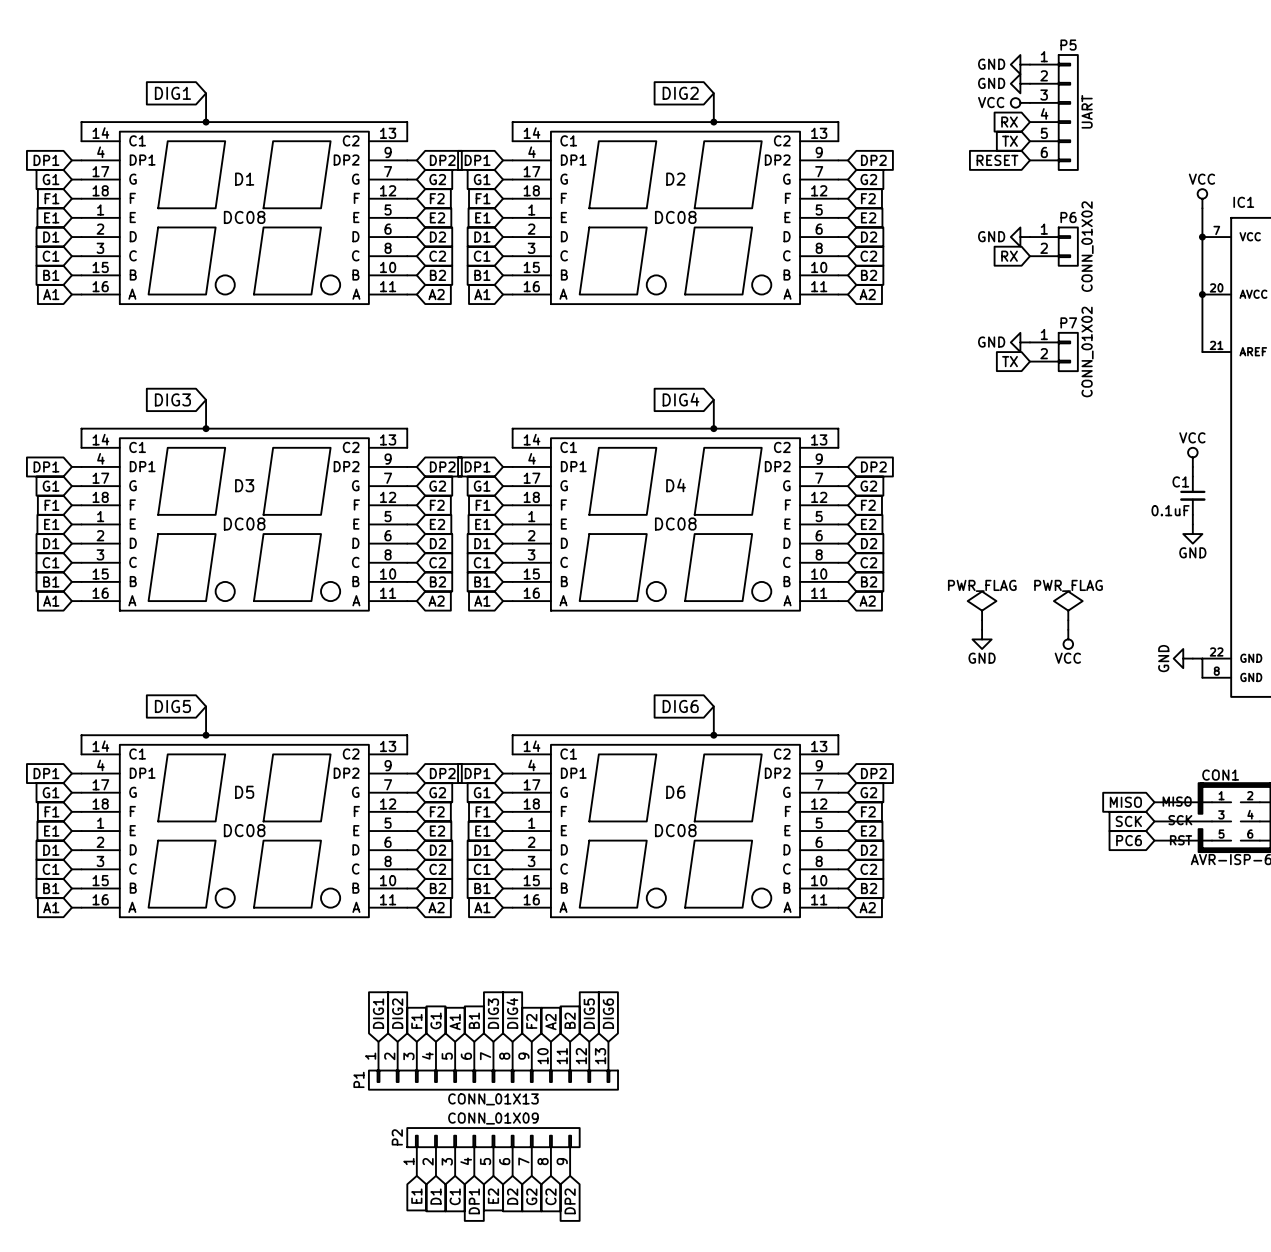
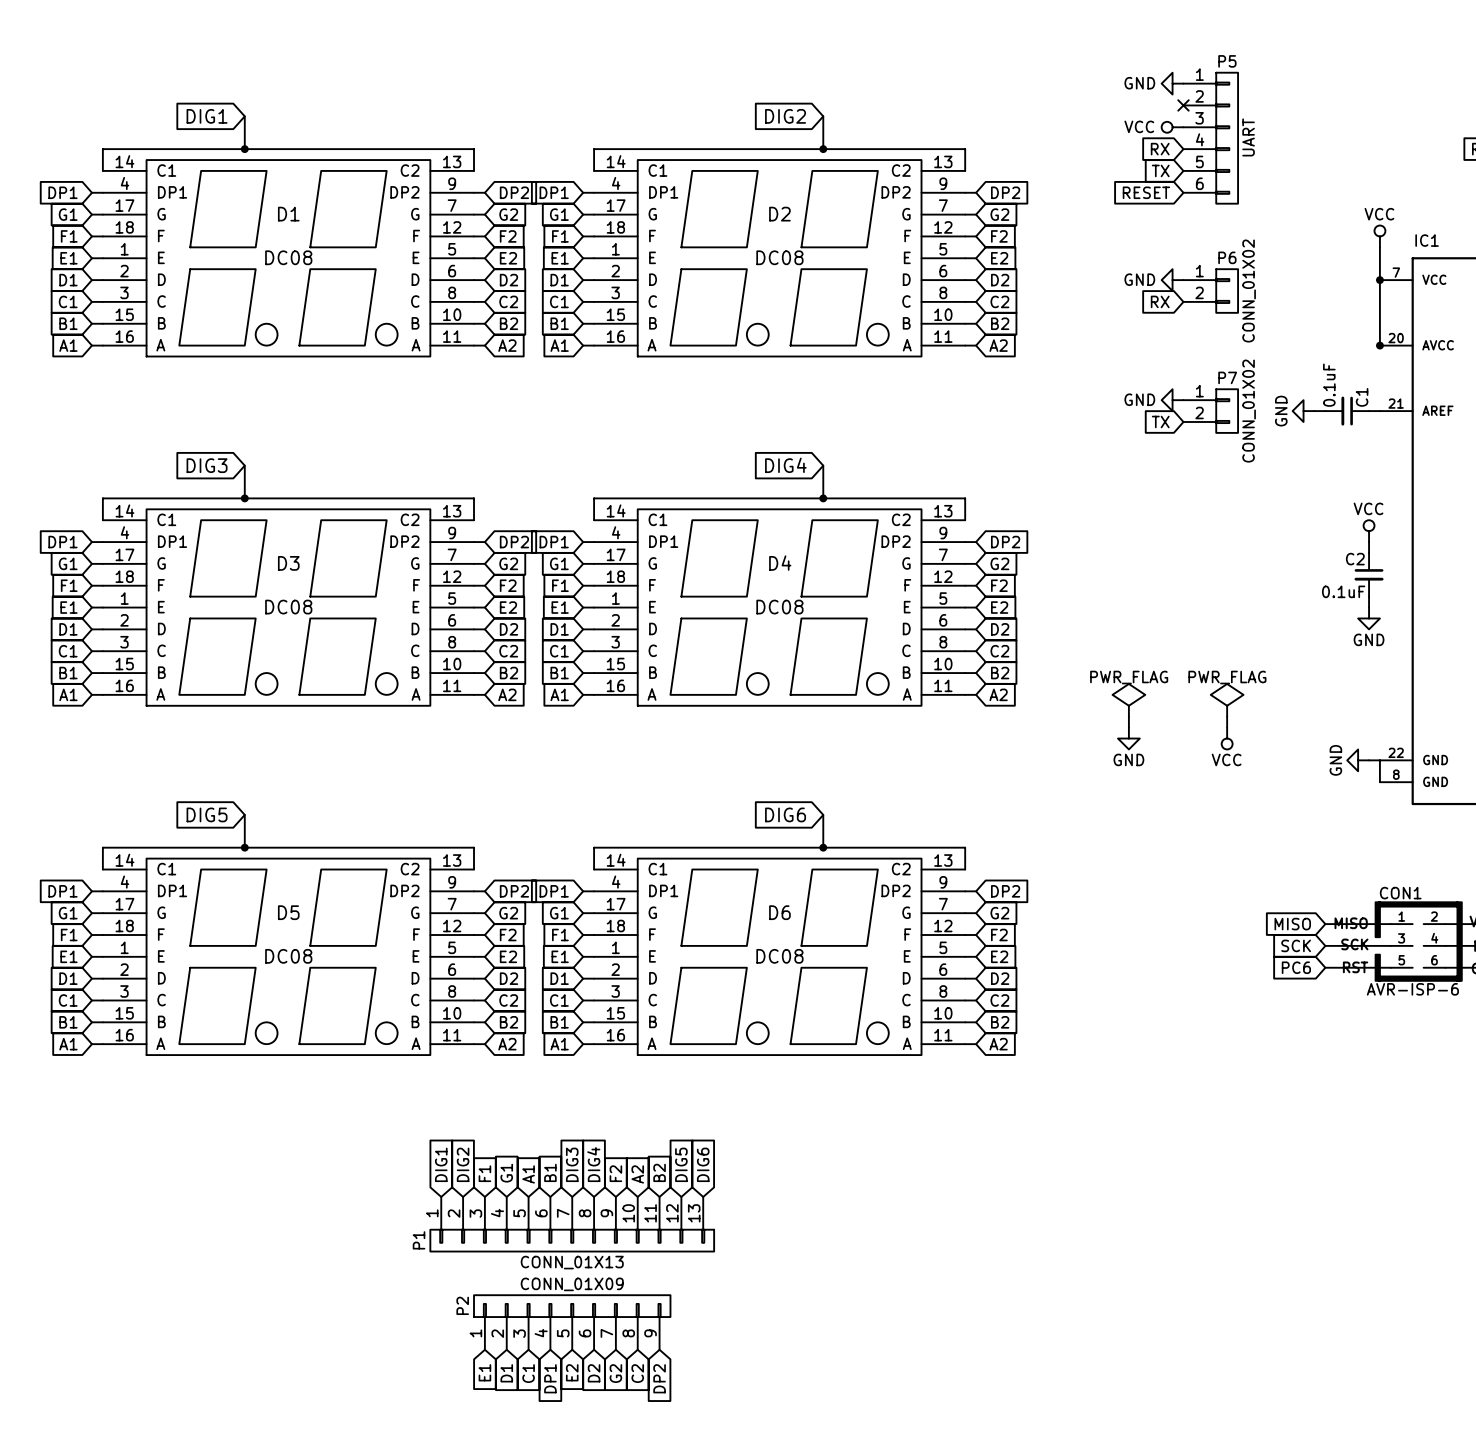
power symbol: GND (1020, 83) -> none
no-connect mark: none -> (1183, 105)
wire: (1202, 294) (1202, 352) -> (1369, 411) (1379, 411)
power symbol: none -> GND (1303, 411)
wire: none -> (1314, 411) (1325, 411)
C1: none -> 0.1uF (1347, 411)
C1 name: C1 (1180, 481) -> C2 (1355, 559)

